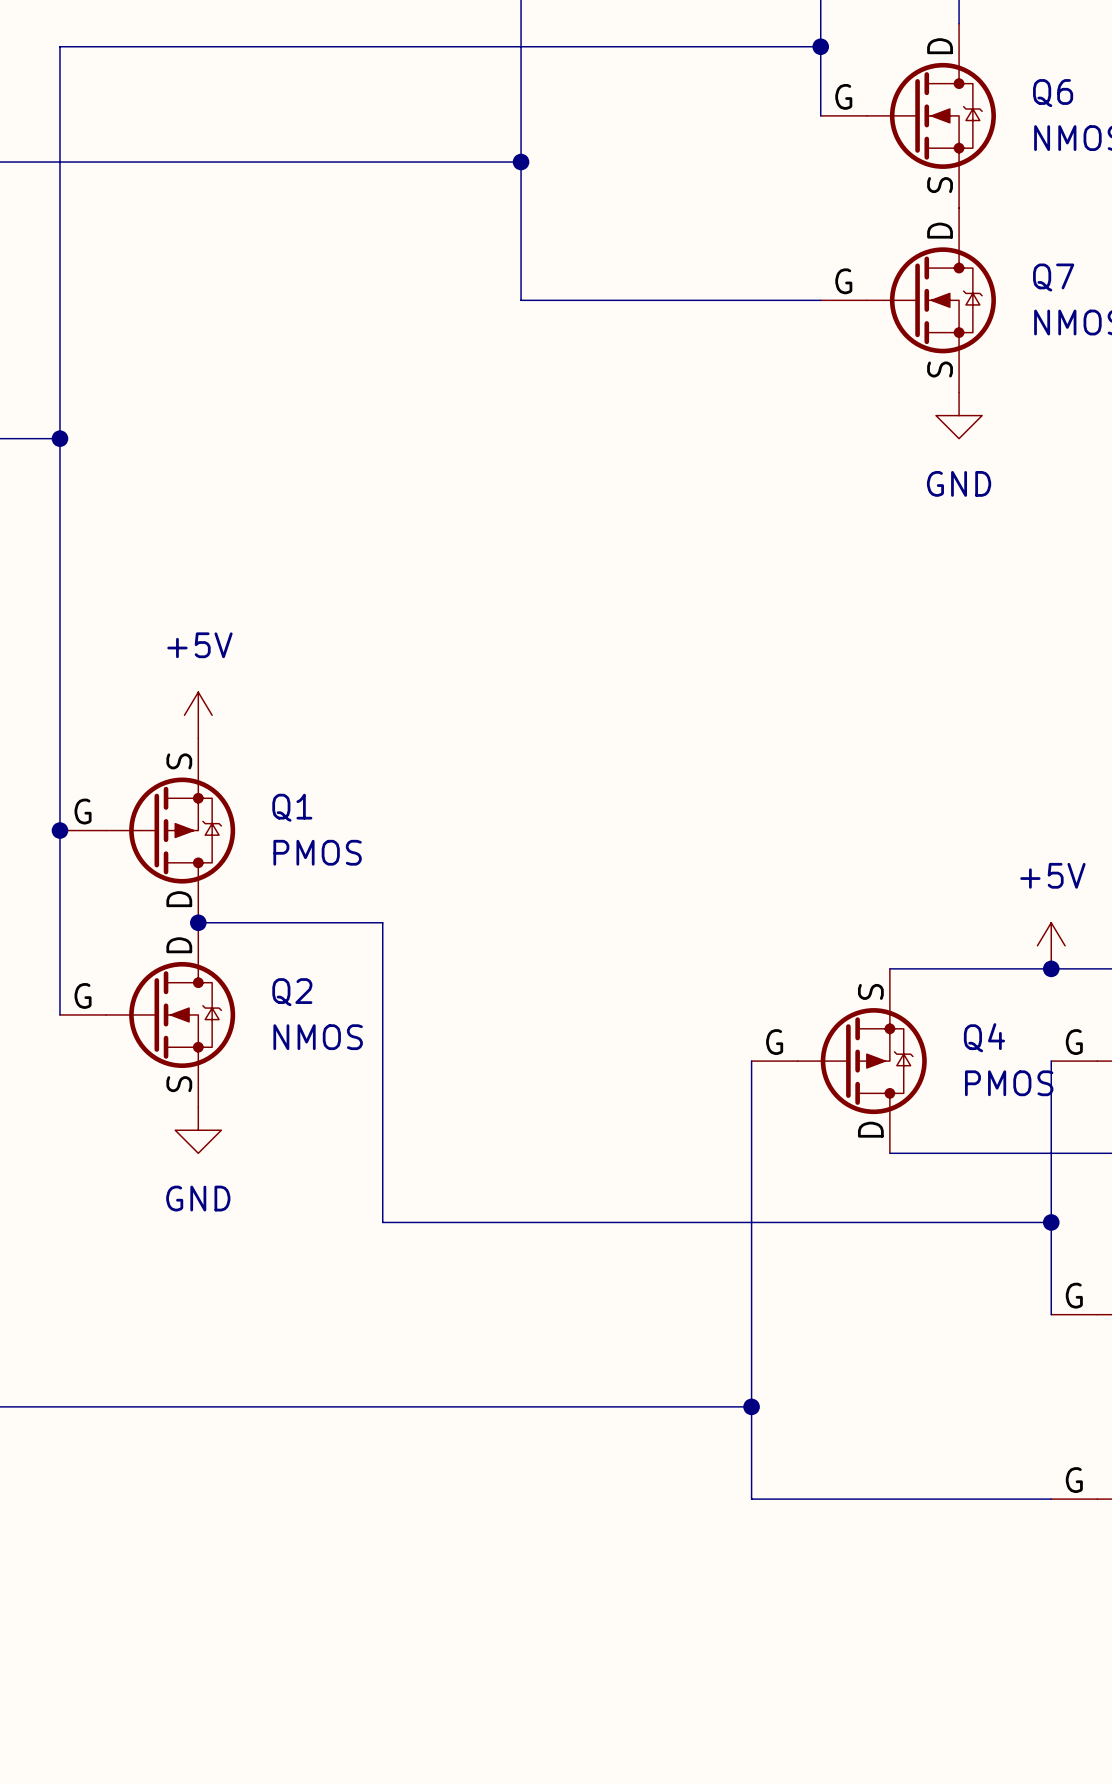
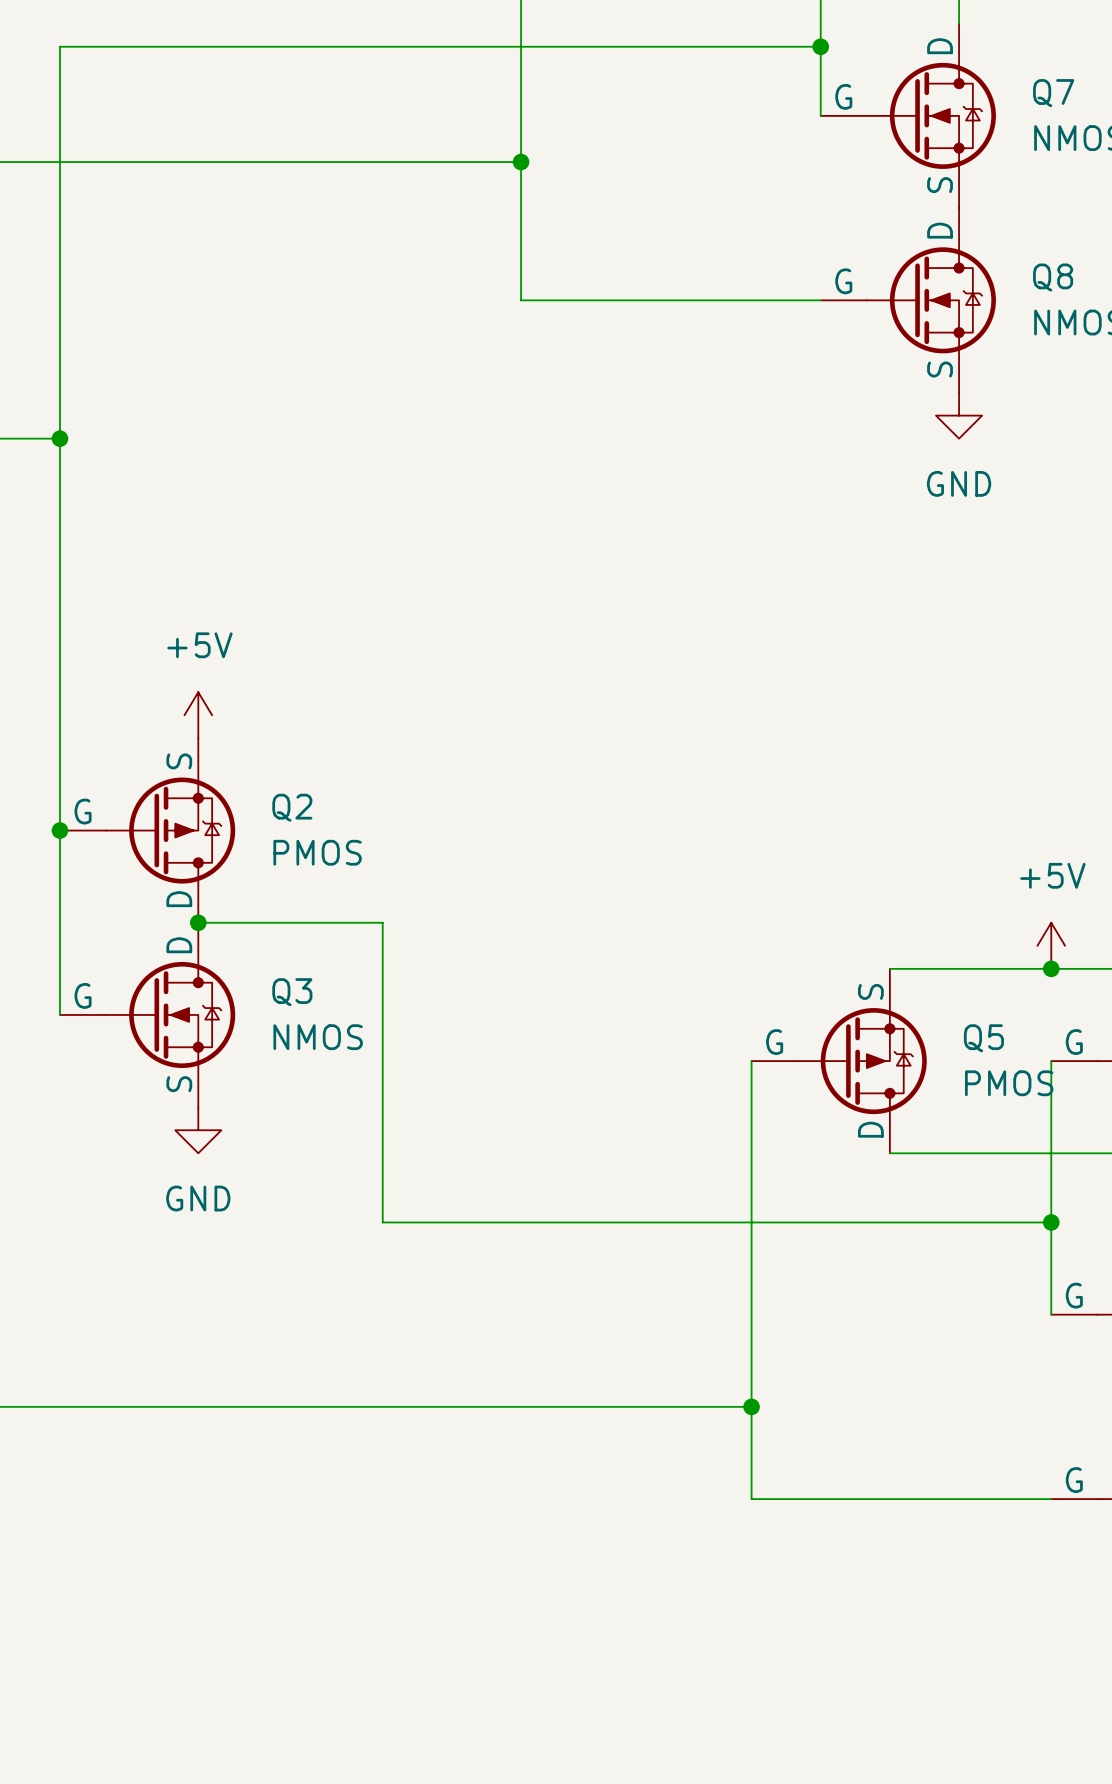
Q6 name: Q6 (1053, 93) -> Q7 (1053, 93)
Q7 name: Q7 (1053, 277) -> Q8 (1053, 277)
Q1 name: Q1 (292, 807) -> Q2 (292, 807)
Q2 name: Q2 (292, 992) -> Q3 (292, 992)
Q4 name: Q4 (984, 1037) -> Q5 (983, 1038)

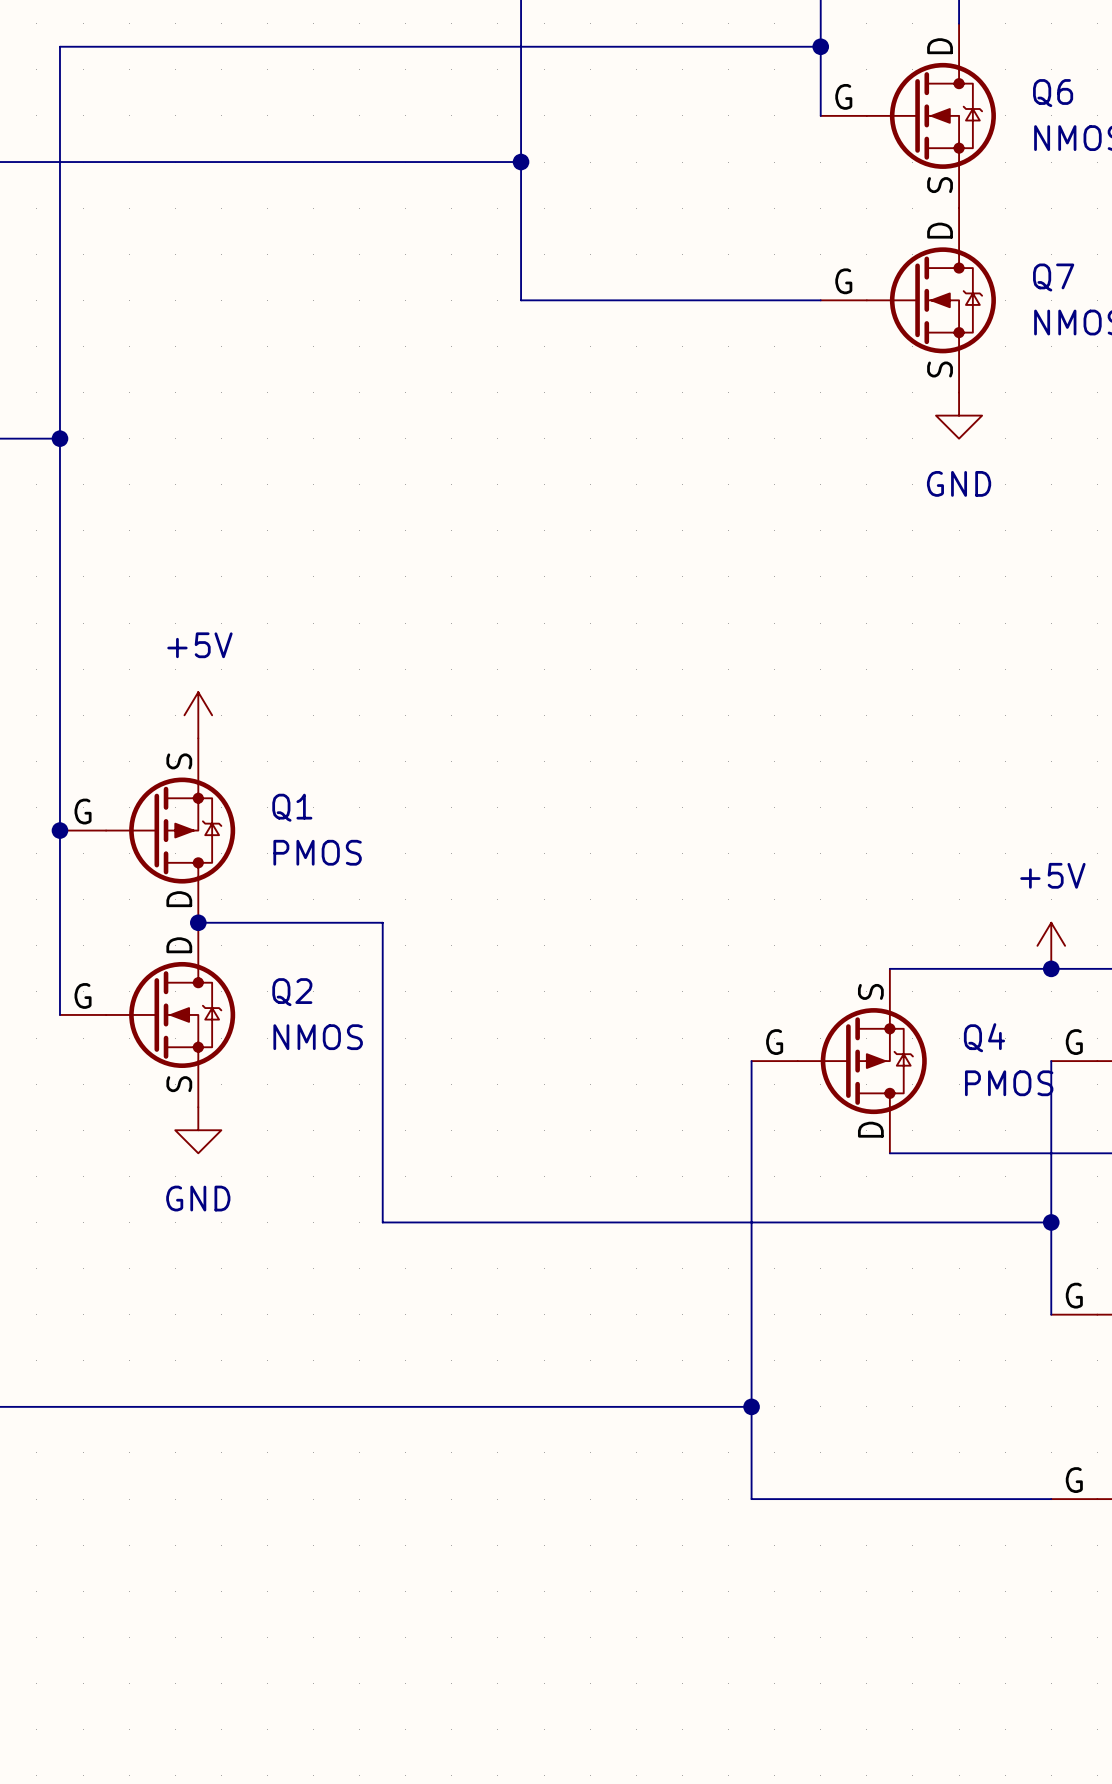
Q7 name: Q7 (1053, 93) -> Q6 (1053, 93)
Q8 name: Q8 (1053, 277) -> Q7 (1053, 277)
Q2 name: Q2 (292, 807) -> Q1 (292, 807)
Q3 name: Q3 (292, 992) -> Q2 (292, 992)
Q5 name: Q5 (983, 1038) -> Q4 (984, 1037)

